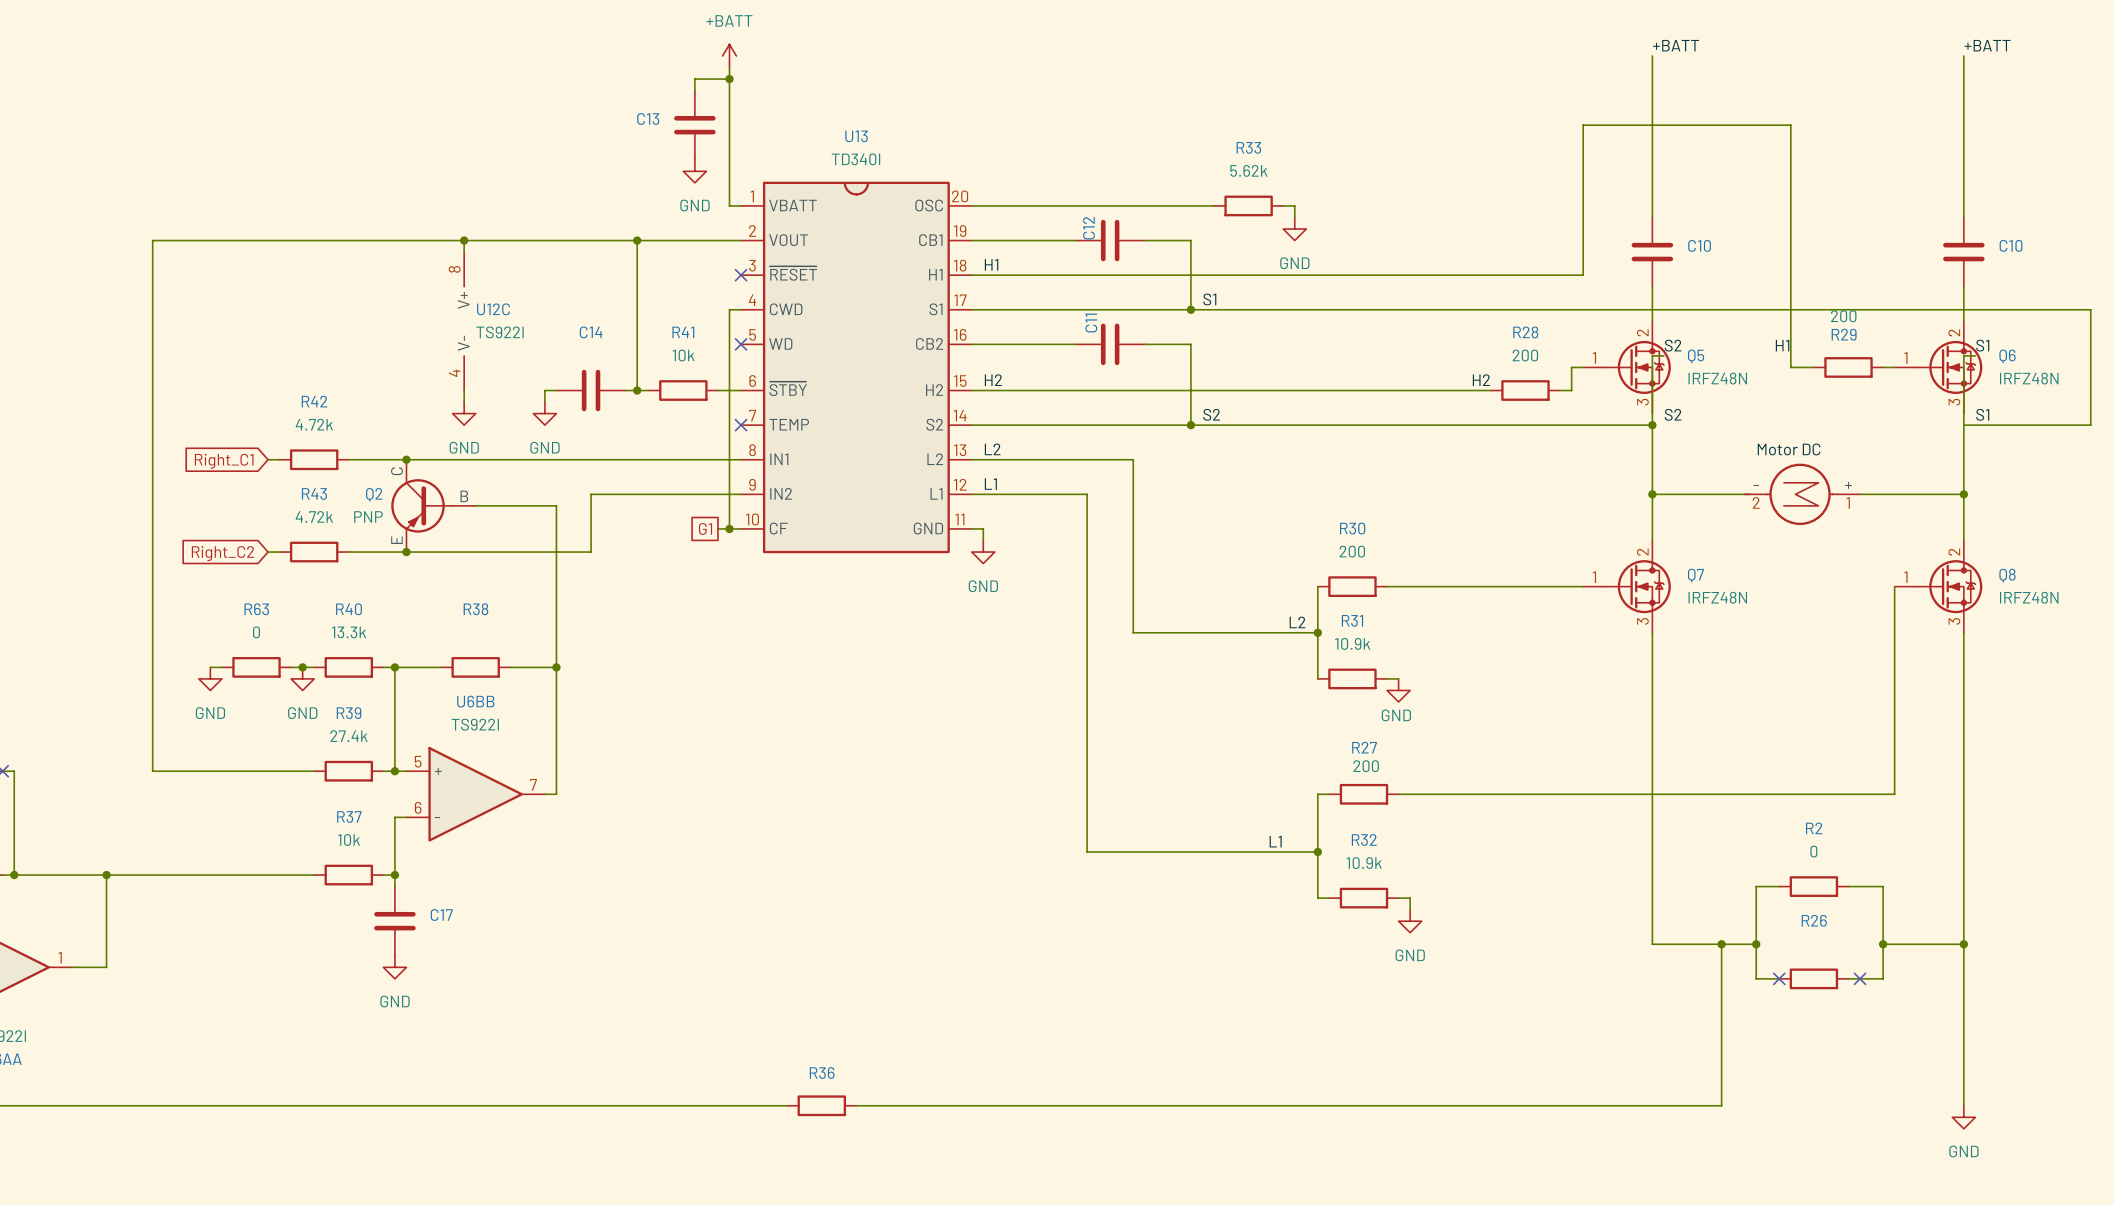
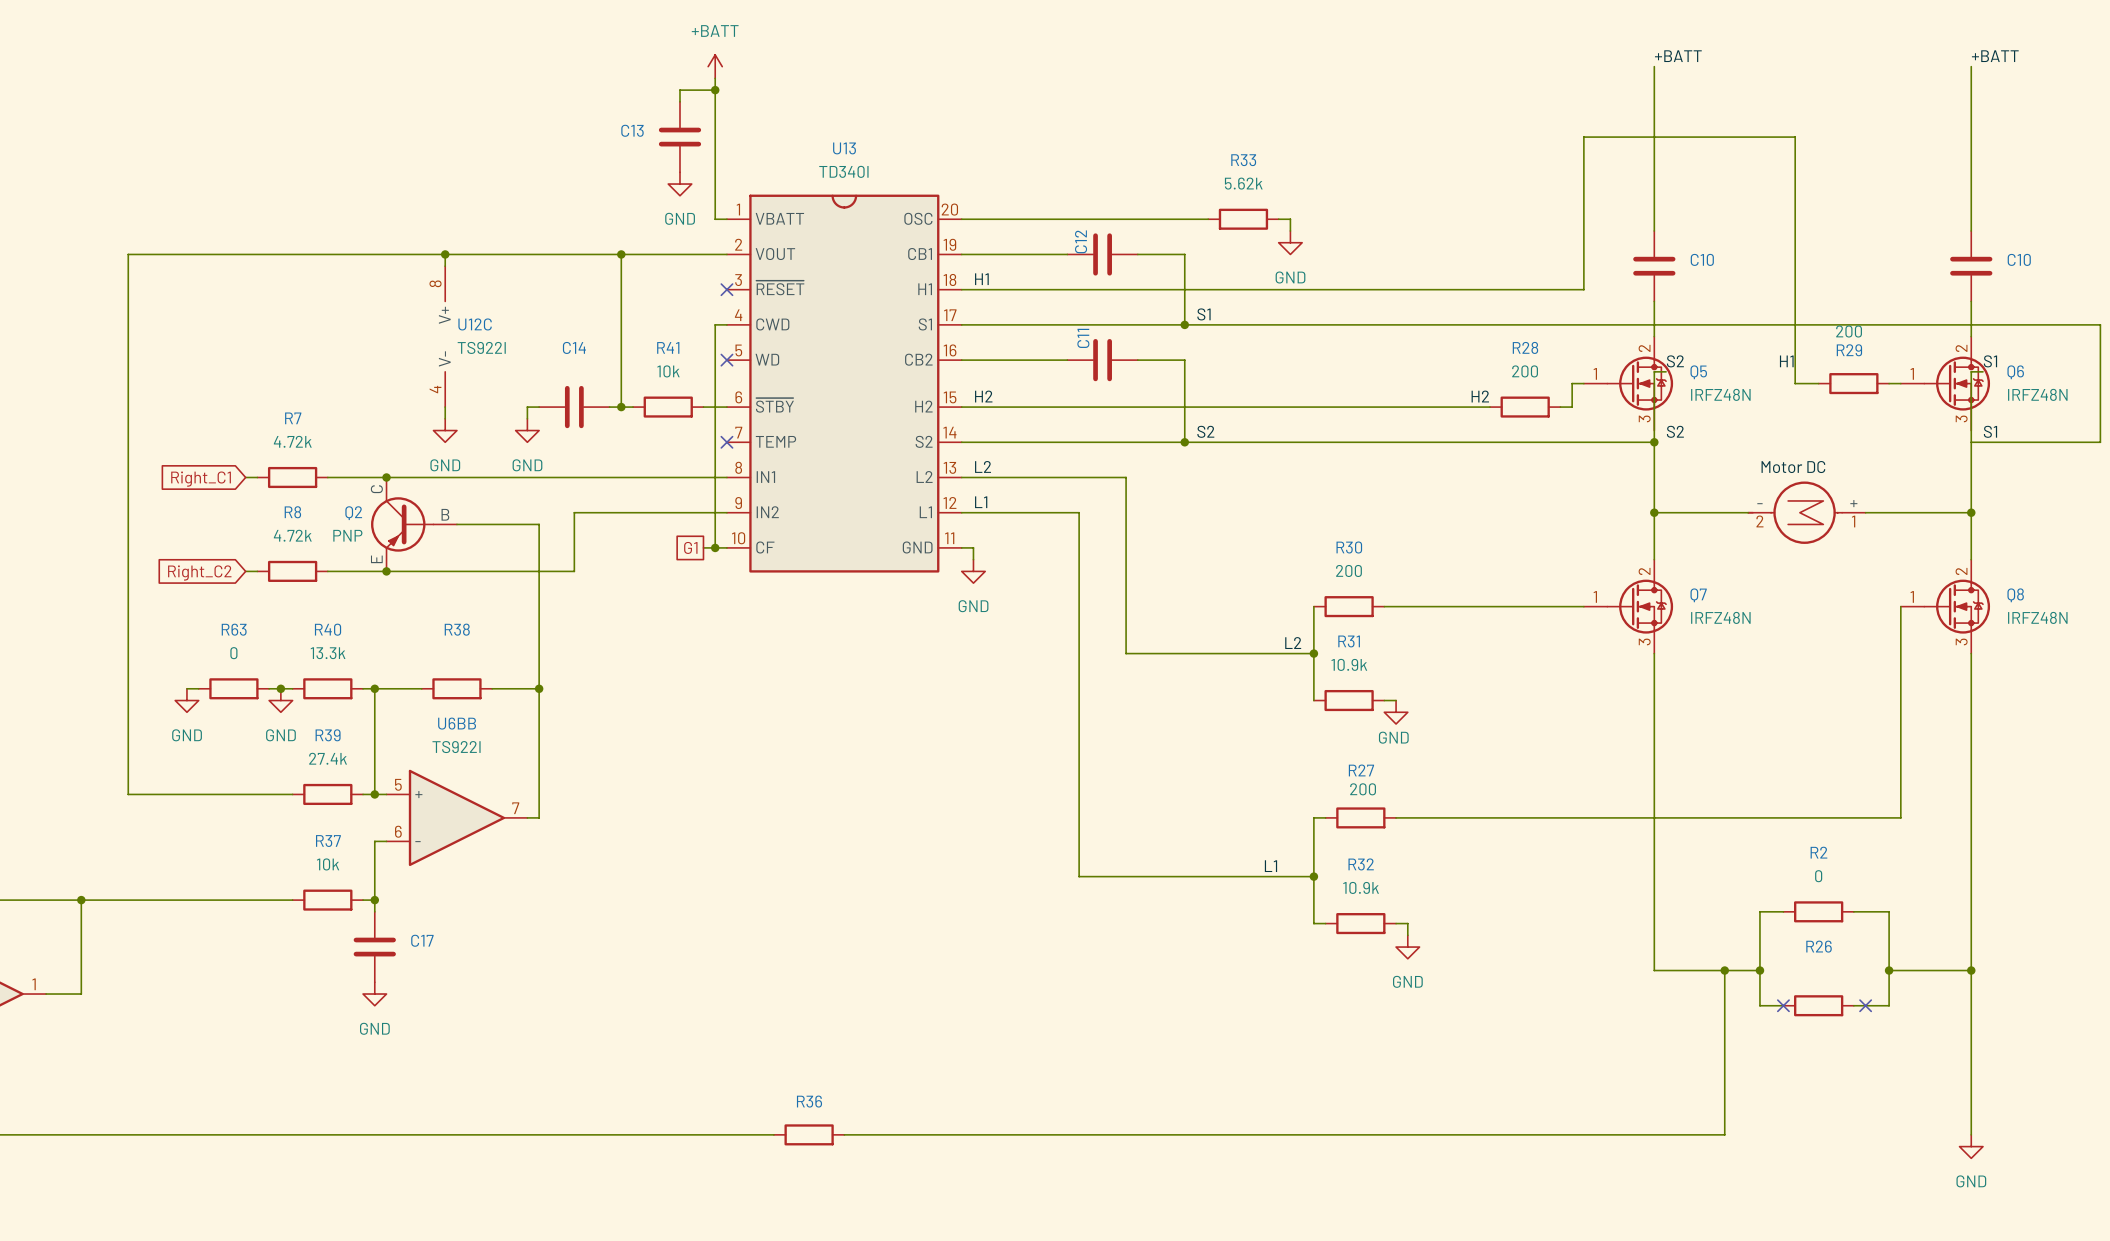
R42 name: R42 (314, 401) -> R7 (293, 418)
R43 name: R43 (314, 493) -> R8 (292, 512)

